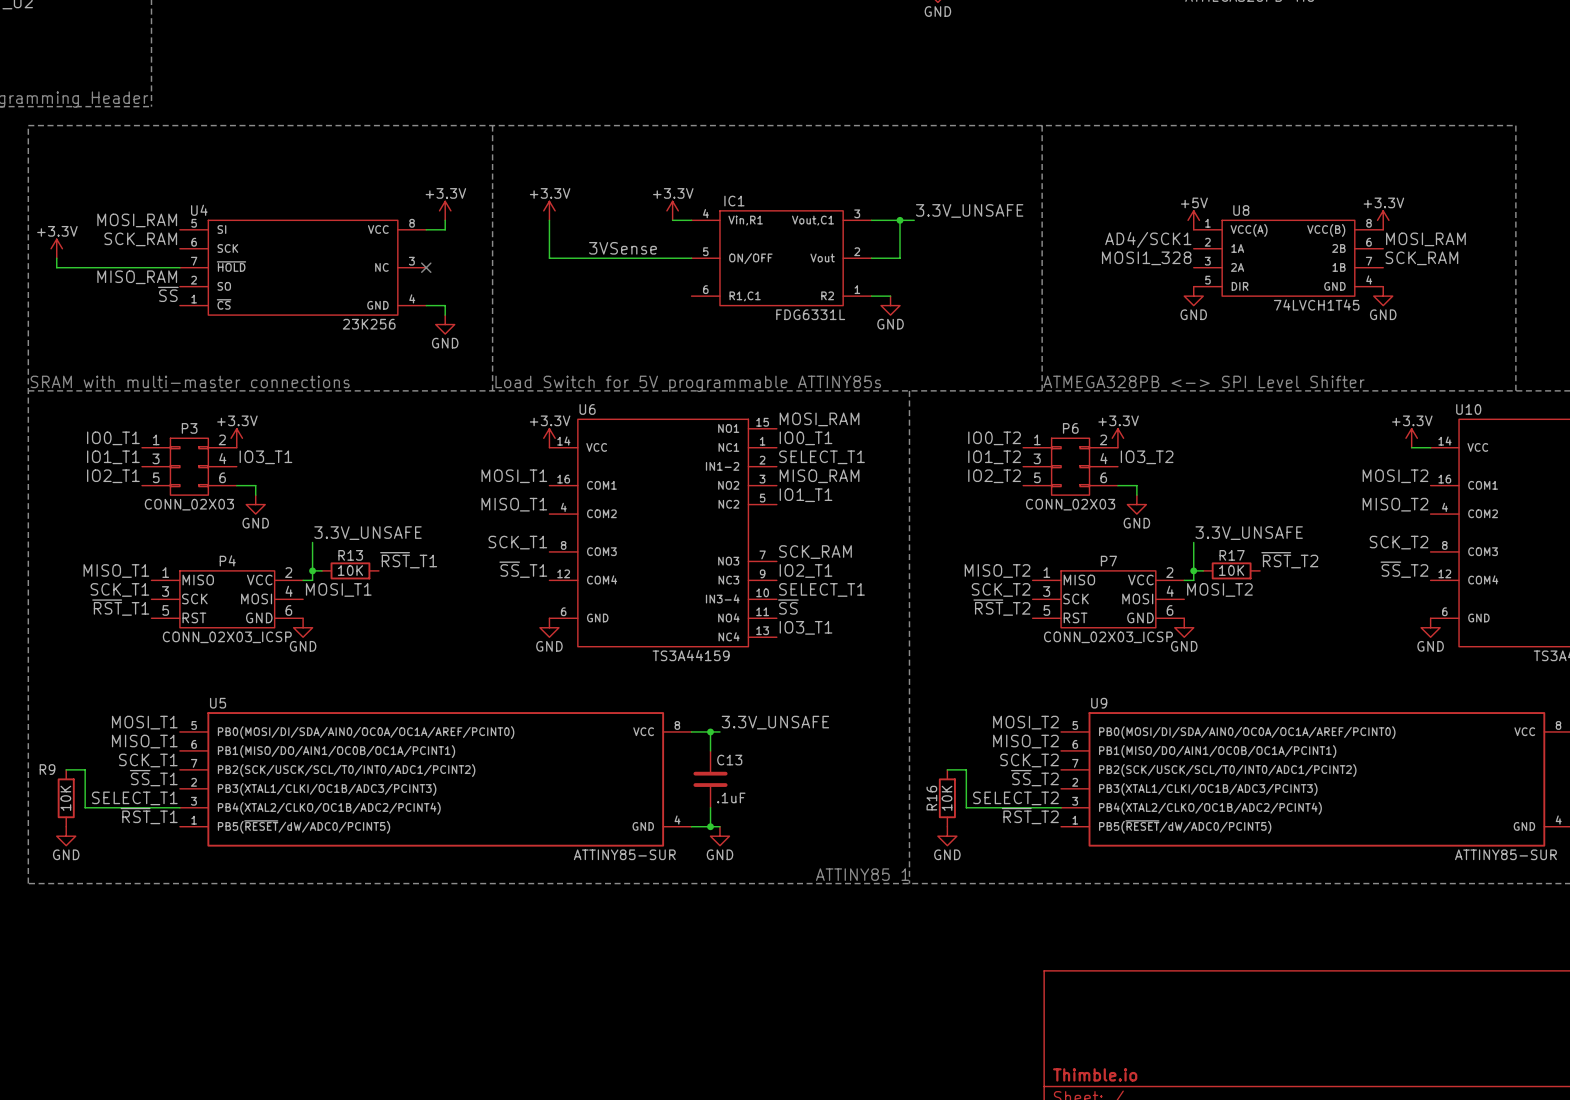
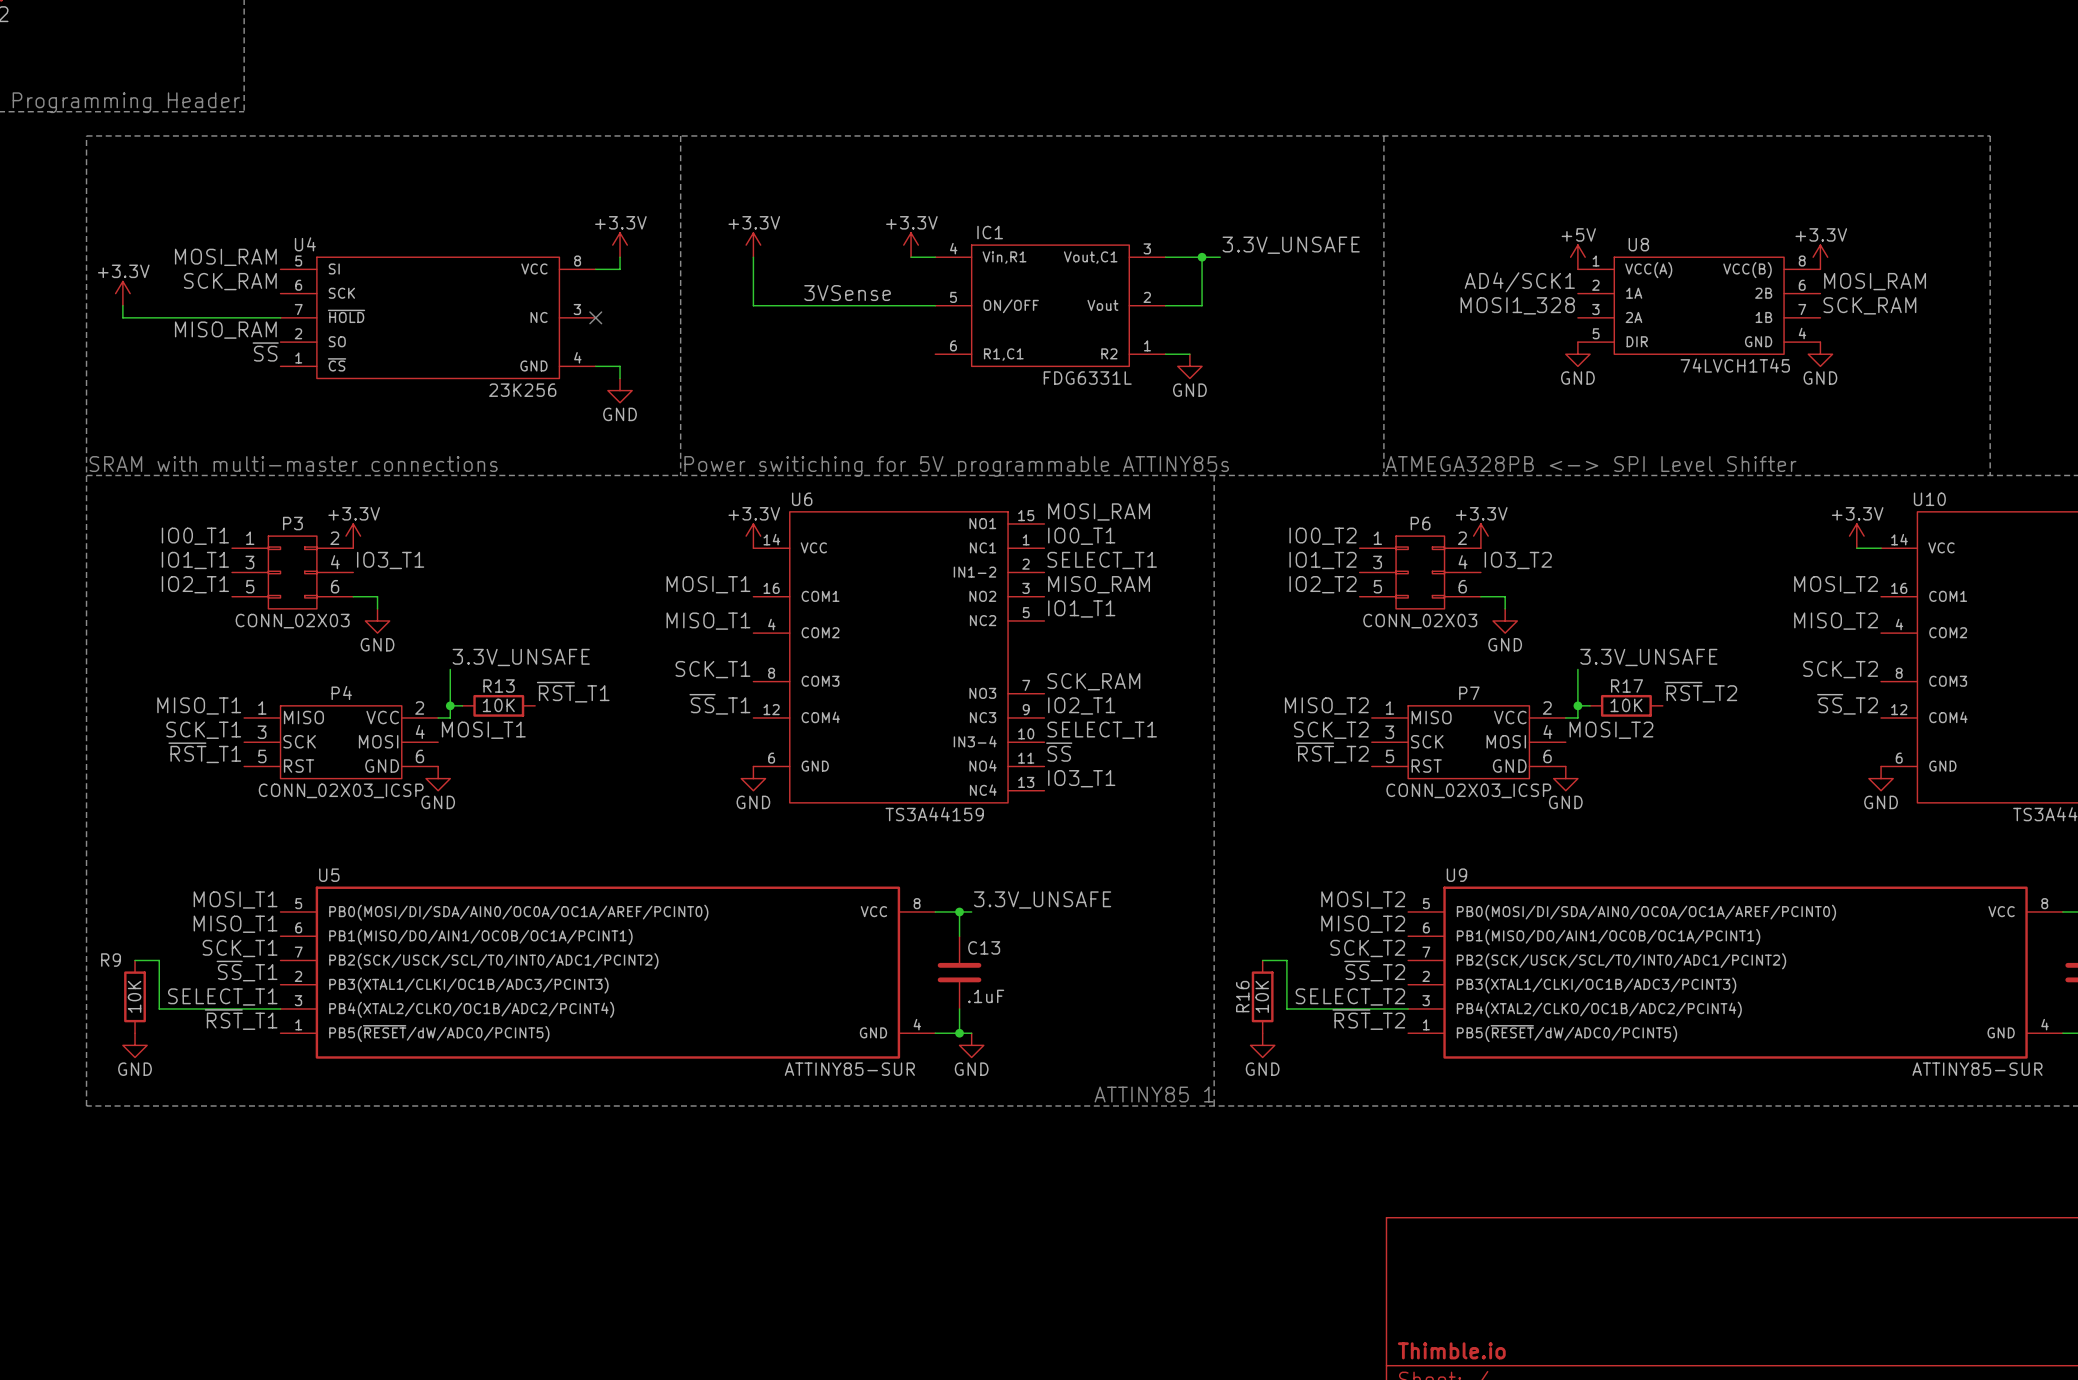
text: Load Switch for 5V programmable ATTINY85s (688, 383) -> Power switiching for 5V programmable ATTINY85s (956, 466)

